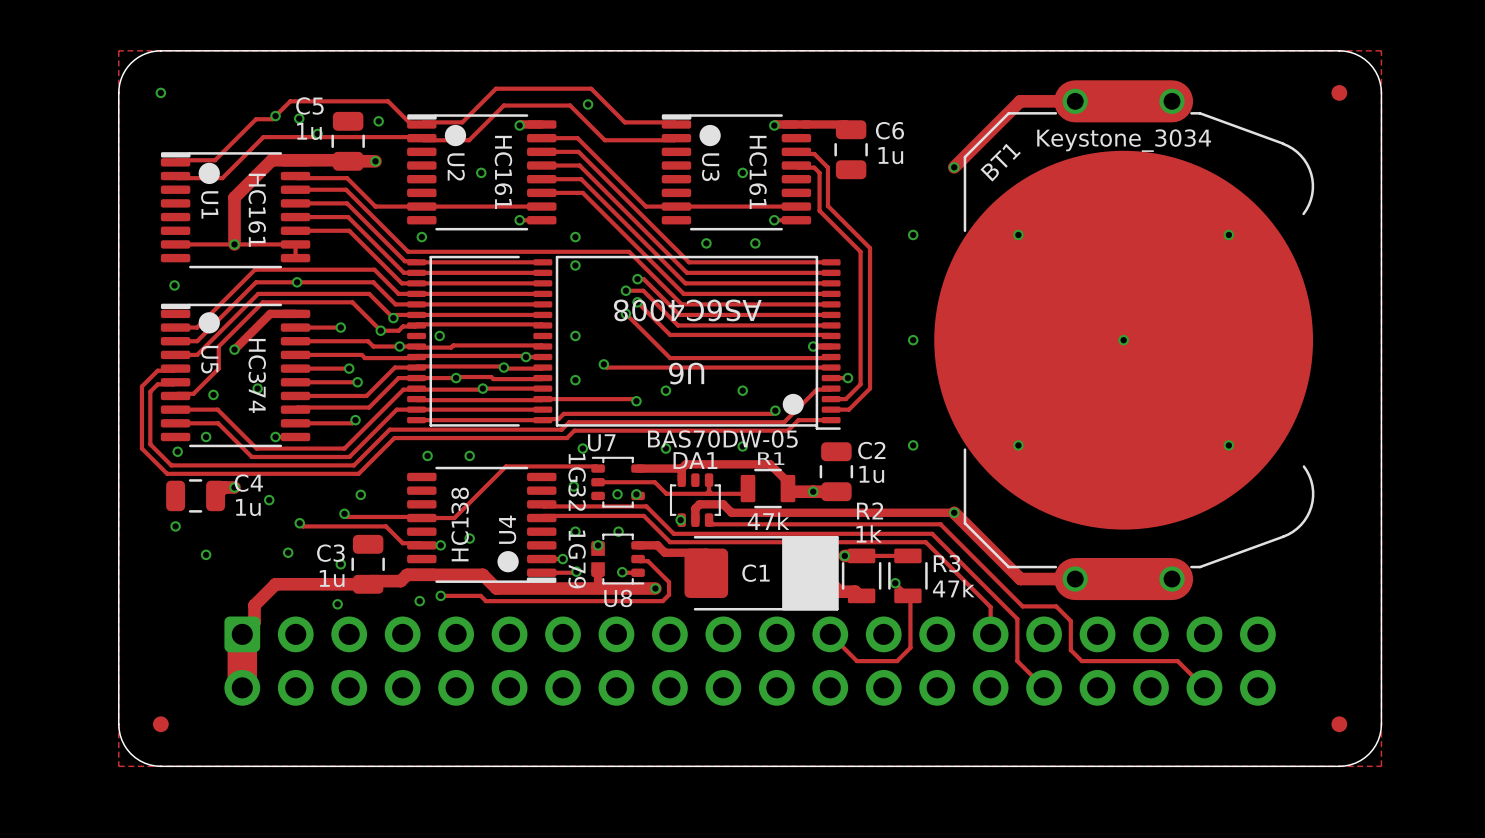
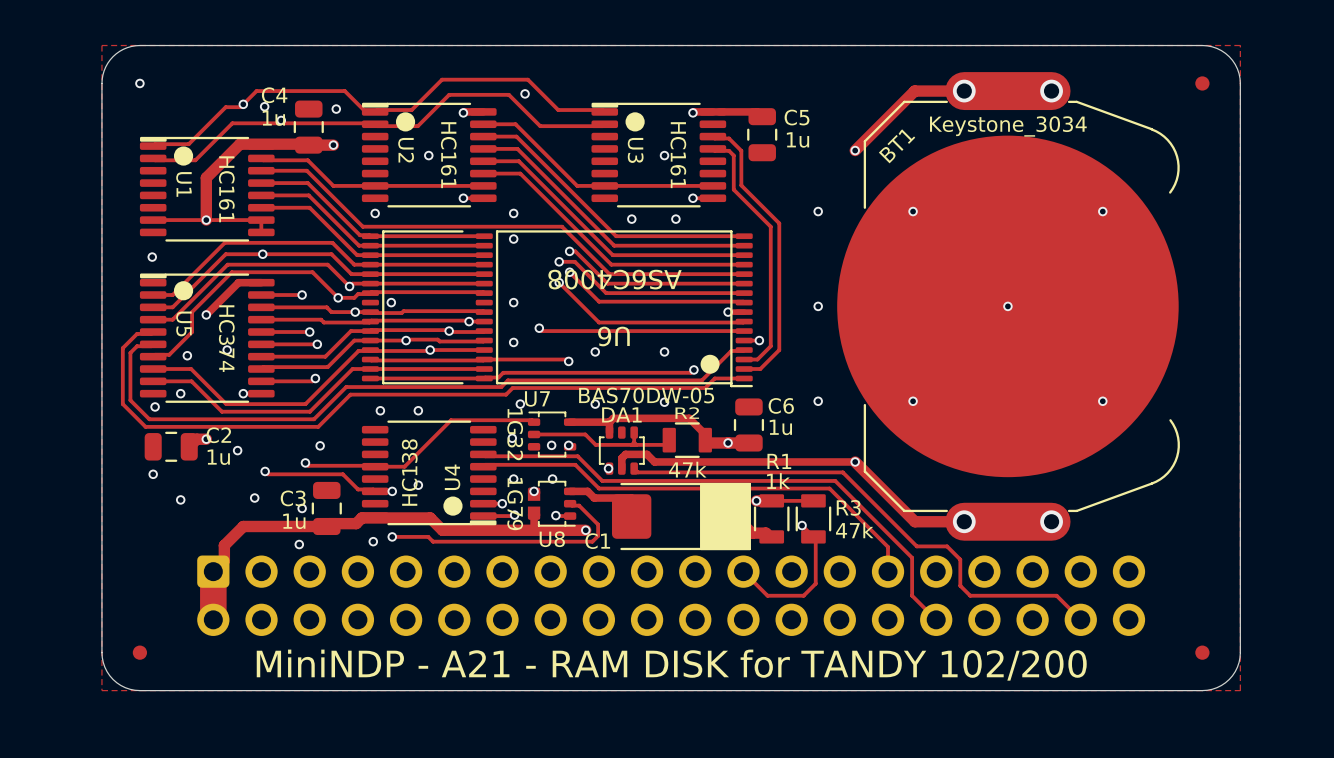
C5 name: C5 (309, 105) -> C4 (274, 95)
C6 name: C6 (889, 130) -> C5 (797, 117)
C2 name: C2 (871, 450) -> C6 (781, 405)
R1 name: R1 (771, 458) -> R2 (687, 413)
C4 name: C4 (248, 483) -> C2 (218, 435)
R2 name: R2 (870, 510) -> R1 (779, 461)
C1 name position: C1 (756, 573) -> C1 (597, 541)
text: none -> MiniNDP - A21 - RAM DISK for TANDY 102/200 (671, 665)

